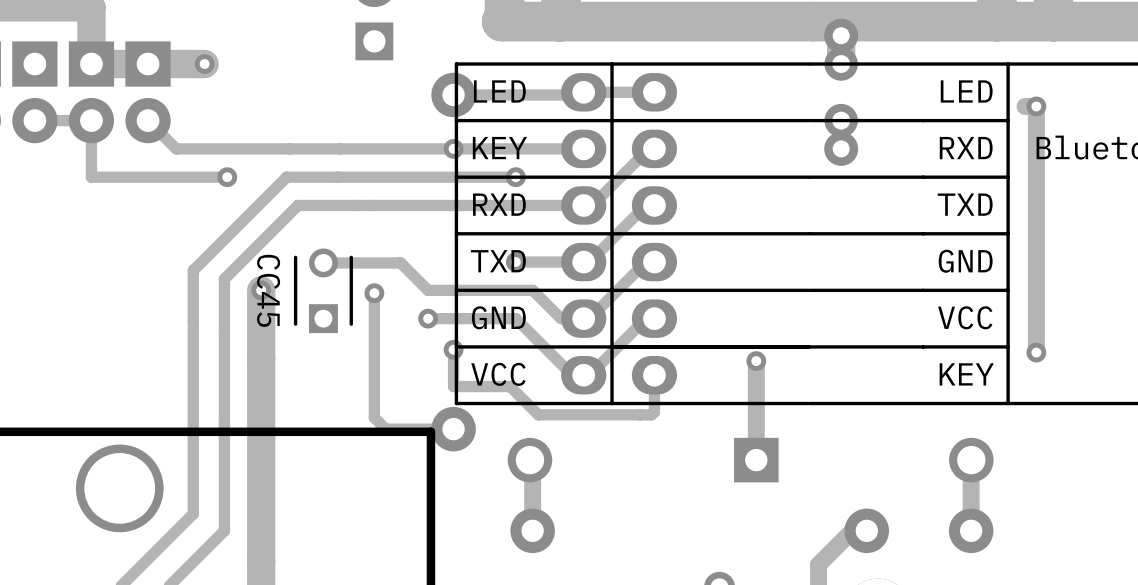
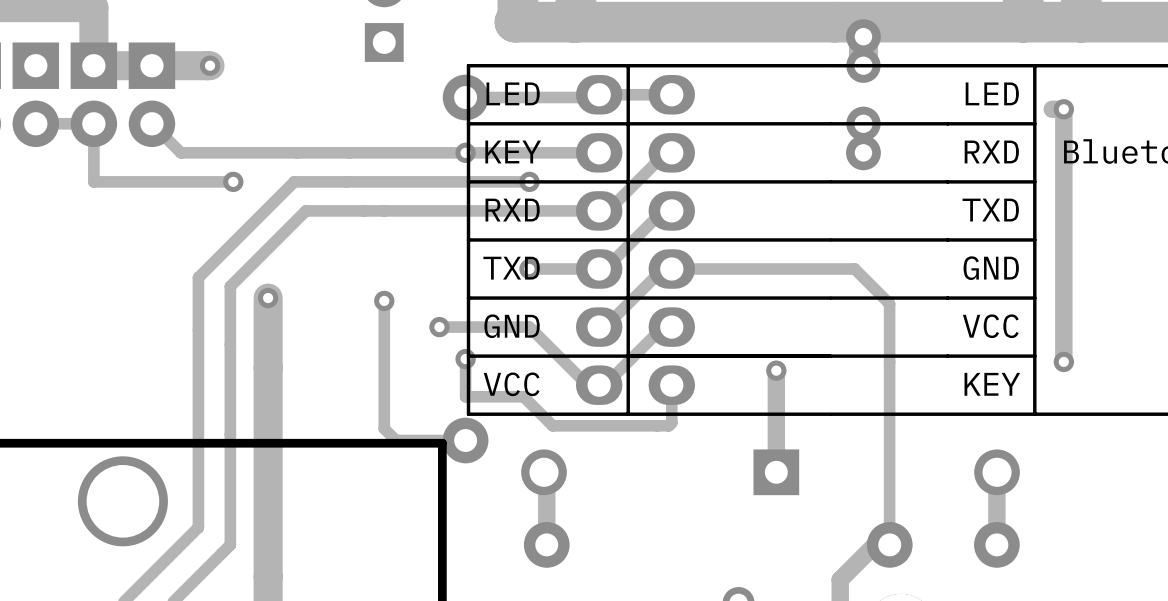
track: (323, 262) (400, 262) (428, 290) (532, 290) (561, 318) (583, 318) -> none
track: none -> (671, 269) (854, 269) (889, 303) (889, 544)
CC45: (323, 290) -> none

